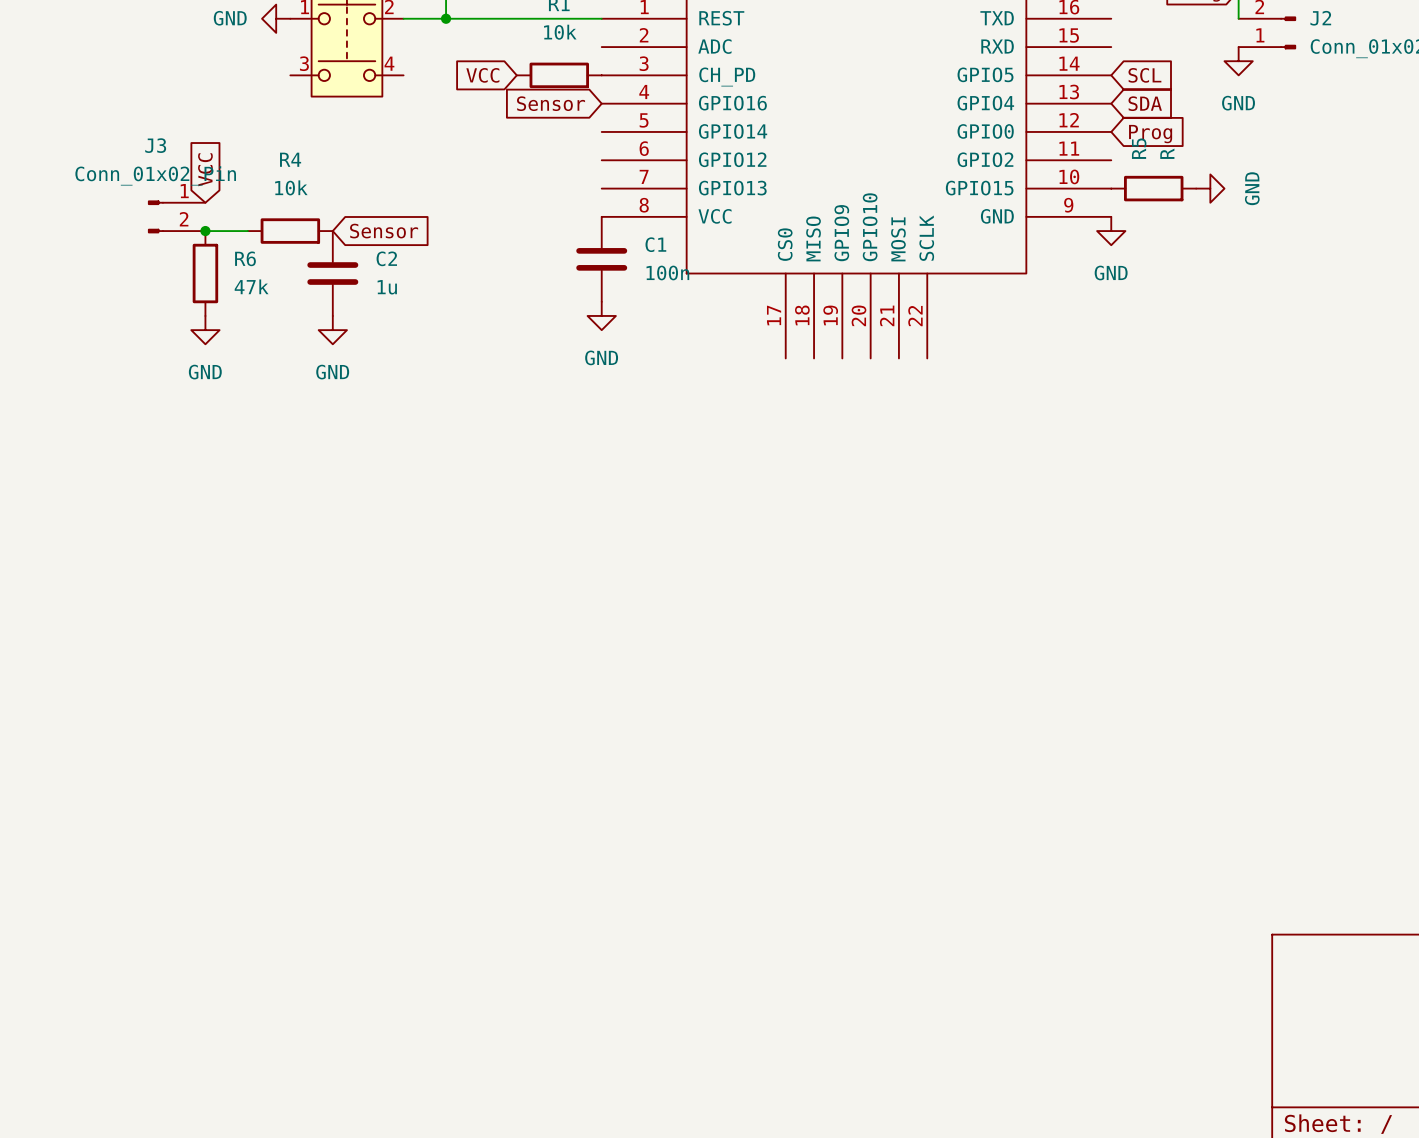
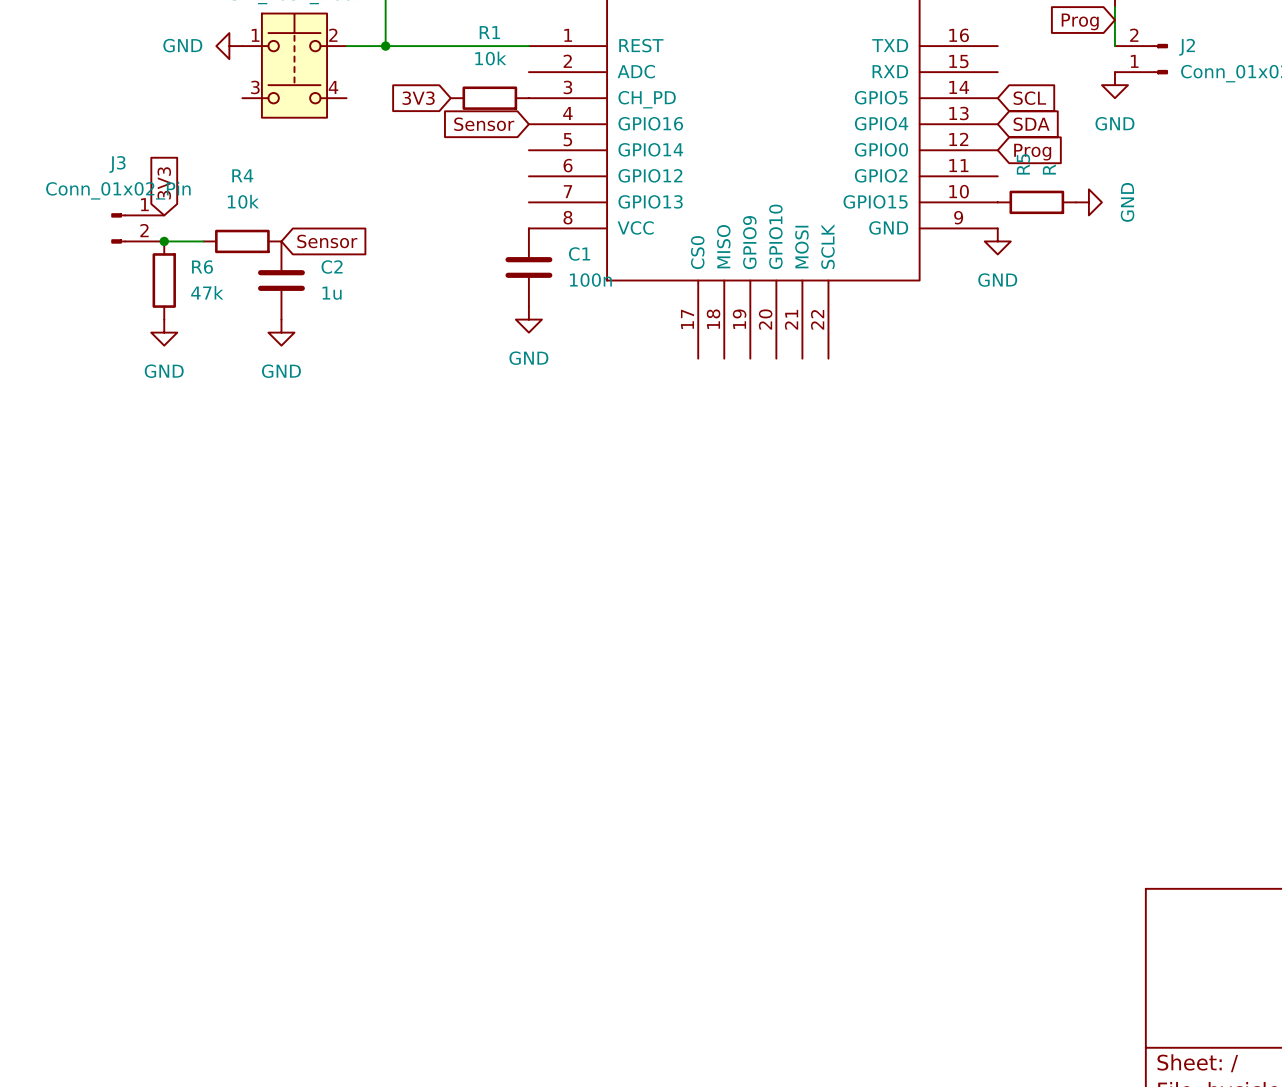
global label: VCC (482, 75) -> 3V3 (418, 98)
global label: VCC (205, 169) -> 3V3 (164, 183)

